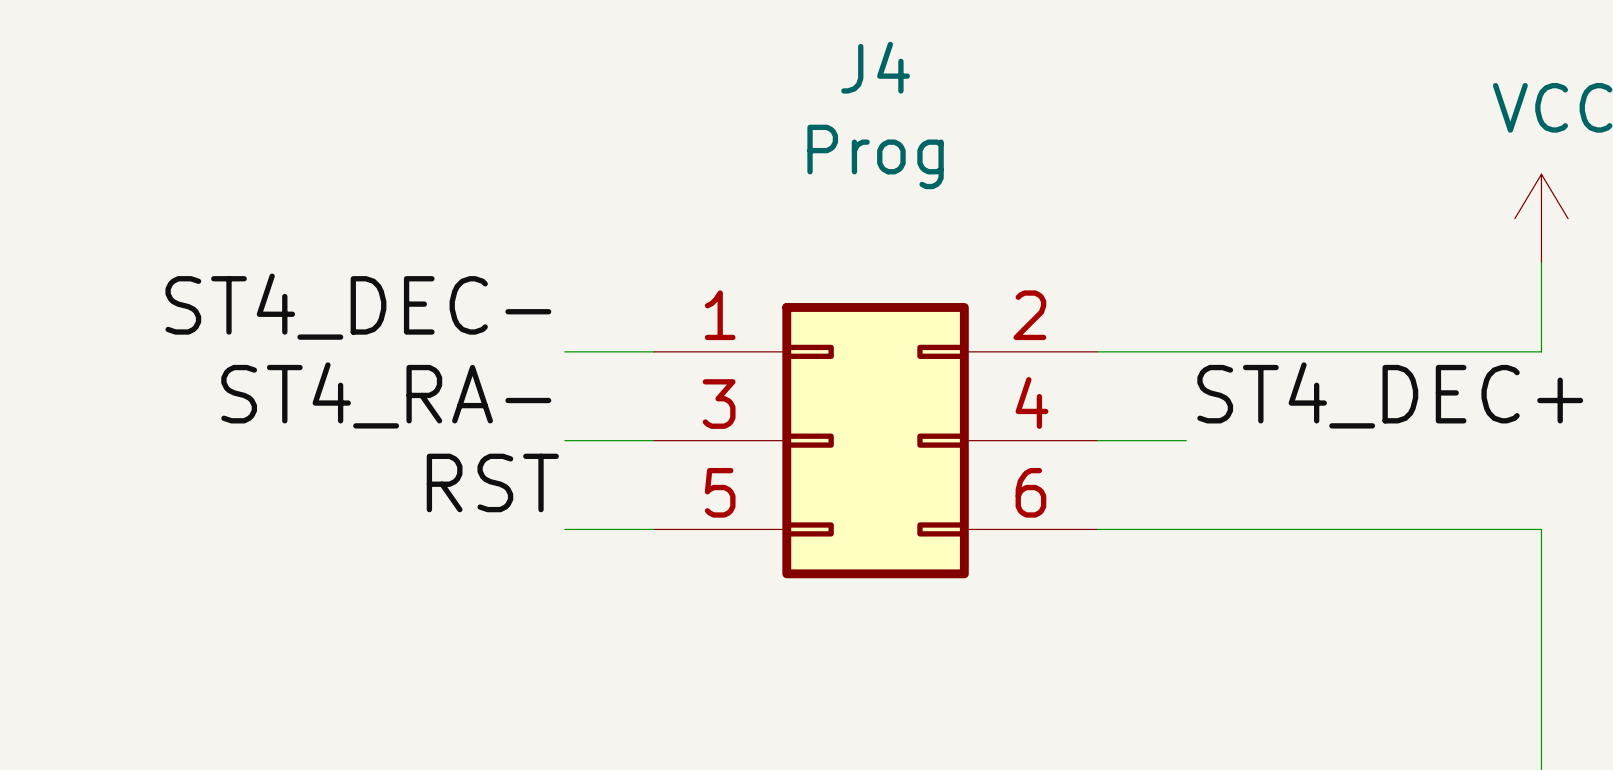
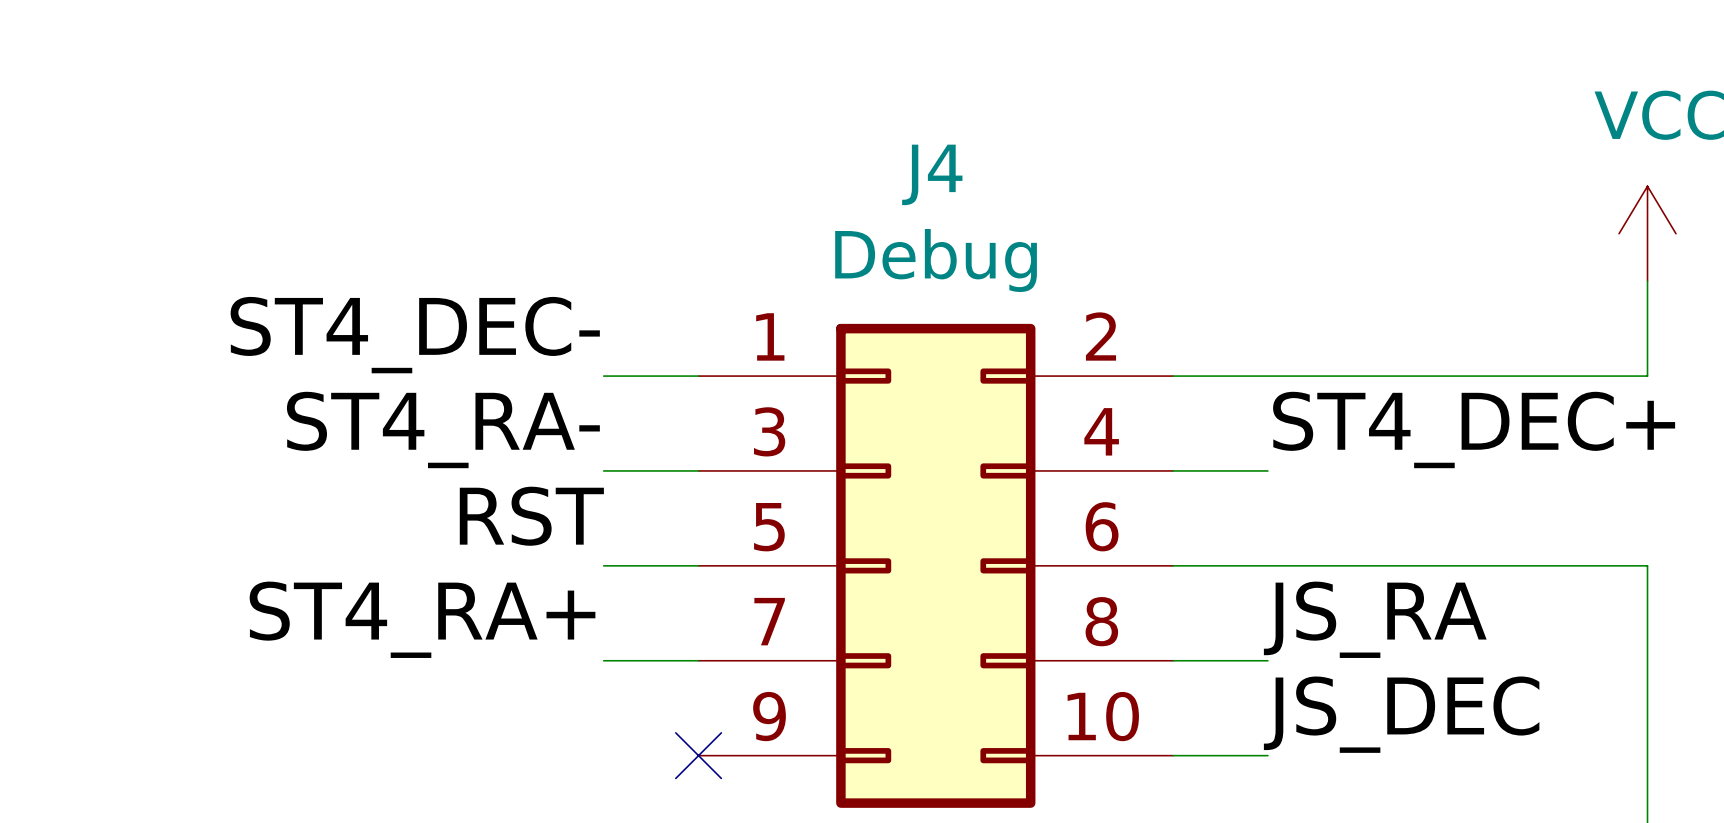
J4 value: Prog (875, 156) -> Debug (936, 260)
J4 symbol: [653, 303, 1098, 579] -> [698, 323, 1174, 808]
label: none -> ST4_RA+ (422, 619)
label: none -> JS_RA (1375, 619)
wire: none -> (603, 660) (698, 660)
wire: none -> (1173, 660) (1267, 660)
label: none -> JS_DEC (1401, 714)
no-connect mark: none -> (698, 755)
wire: none -> (1173, 755) (1267, 755)

